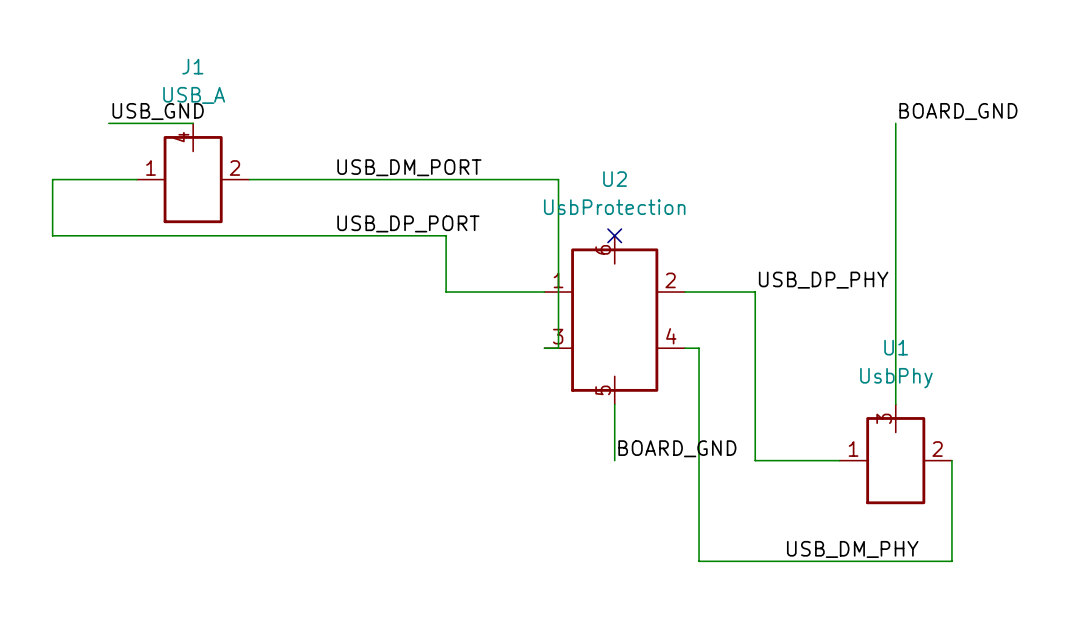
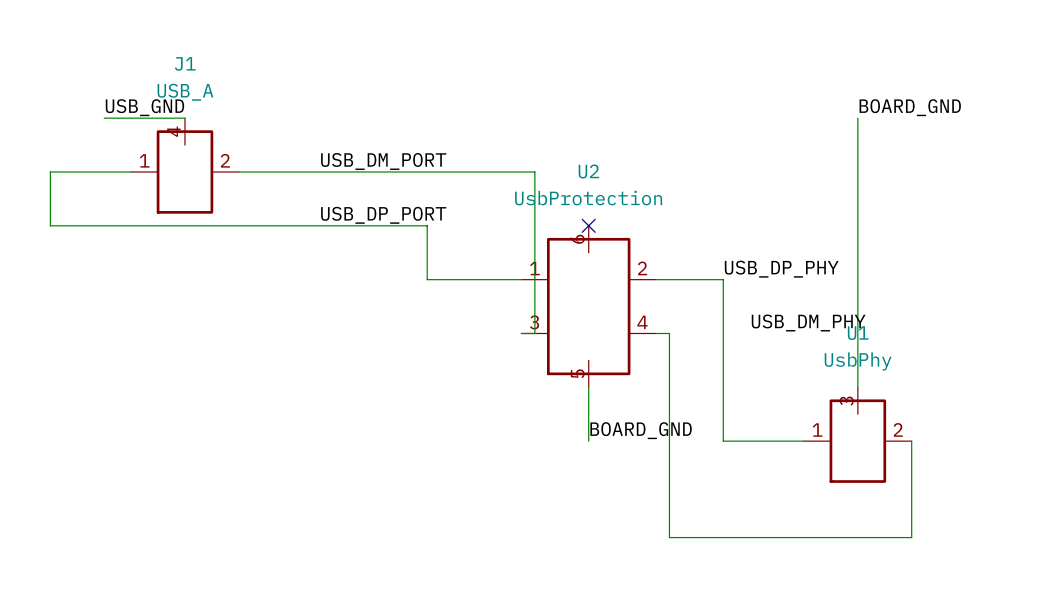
label position: USB_DM_PHY (852, 549) -> USB_DM_PHY (808, 322)

